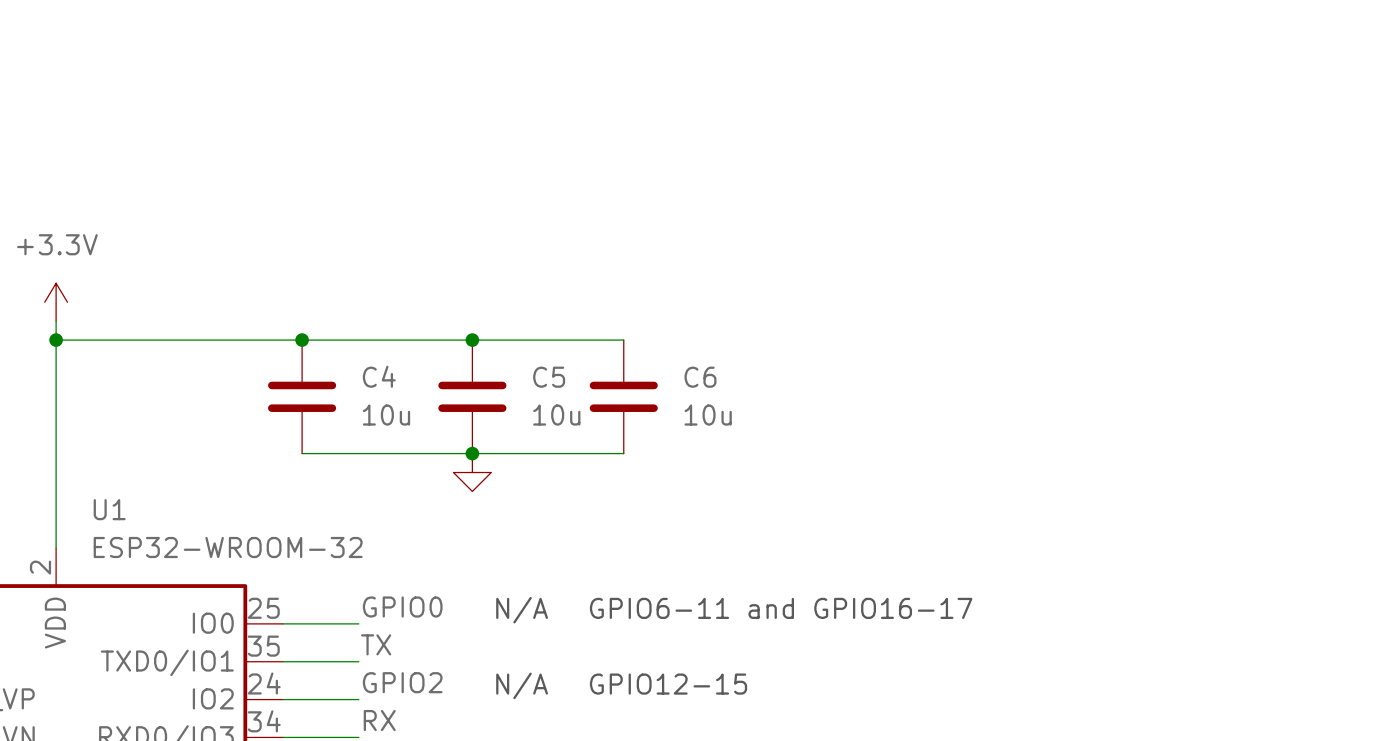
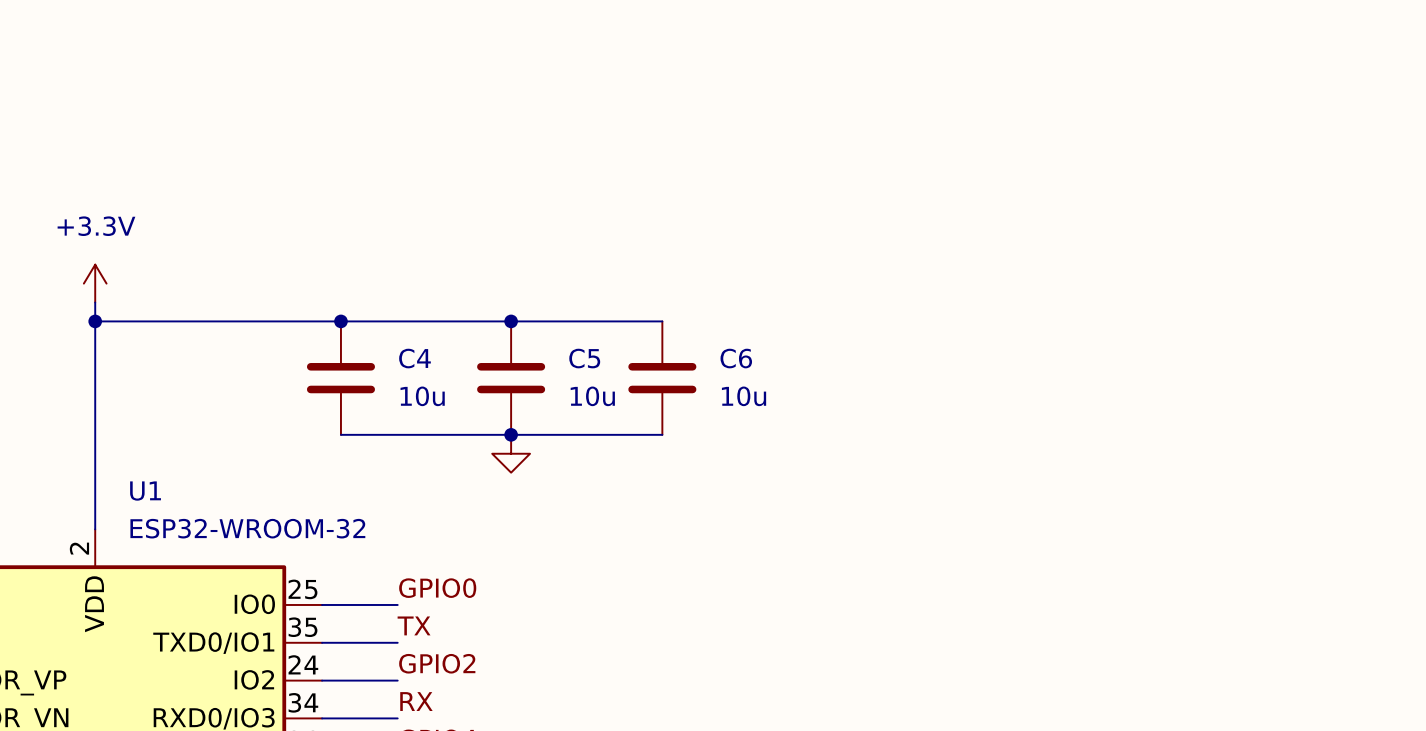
text: GPIO6-11 and GPIO16-17 (781, 608) -> none
text: N/A (522, 610) -> none
text: GPIO12-15 (668, 684) -> none
text: N/A (522, 685) -> none

